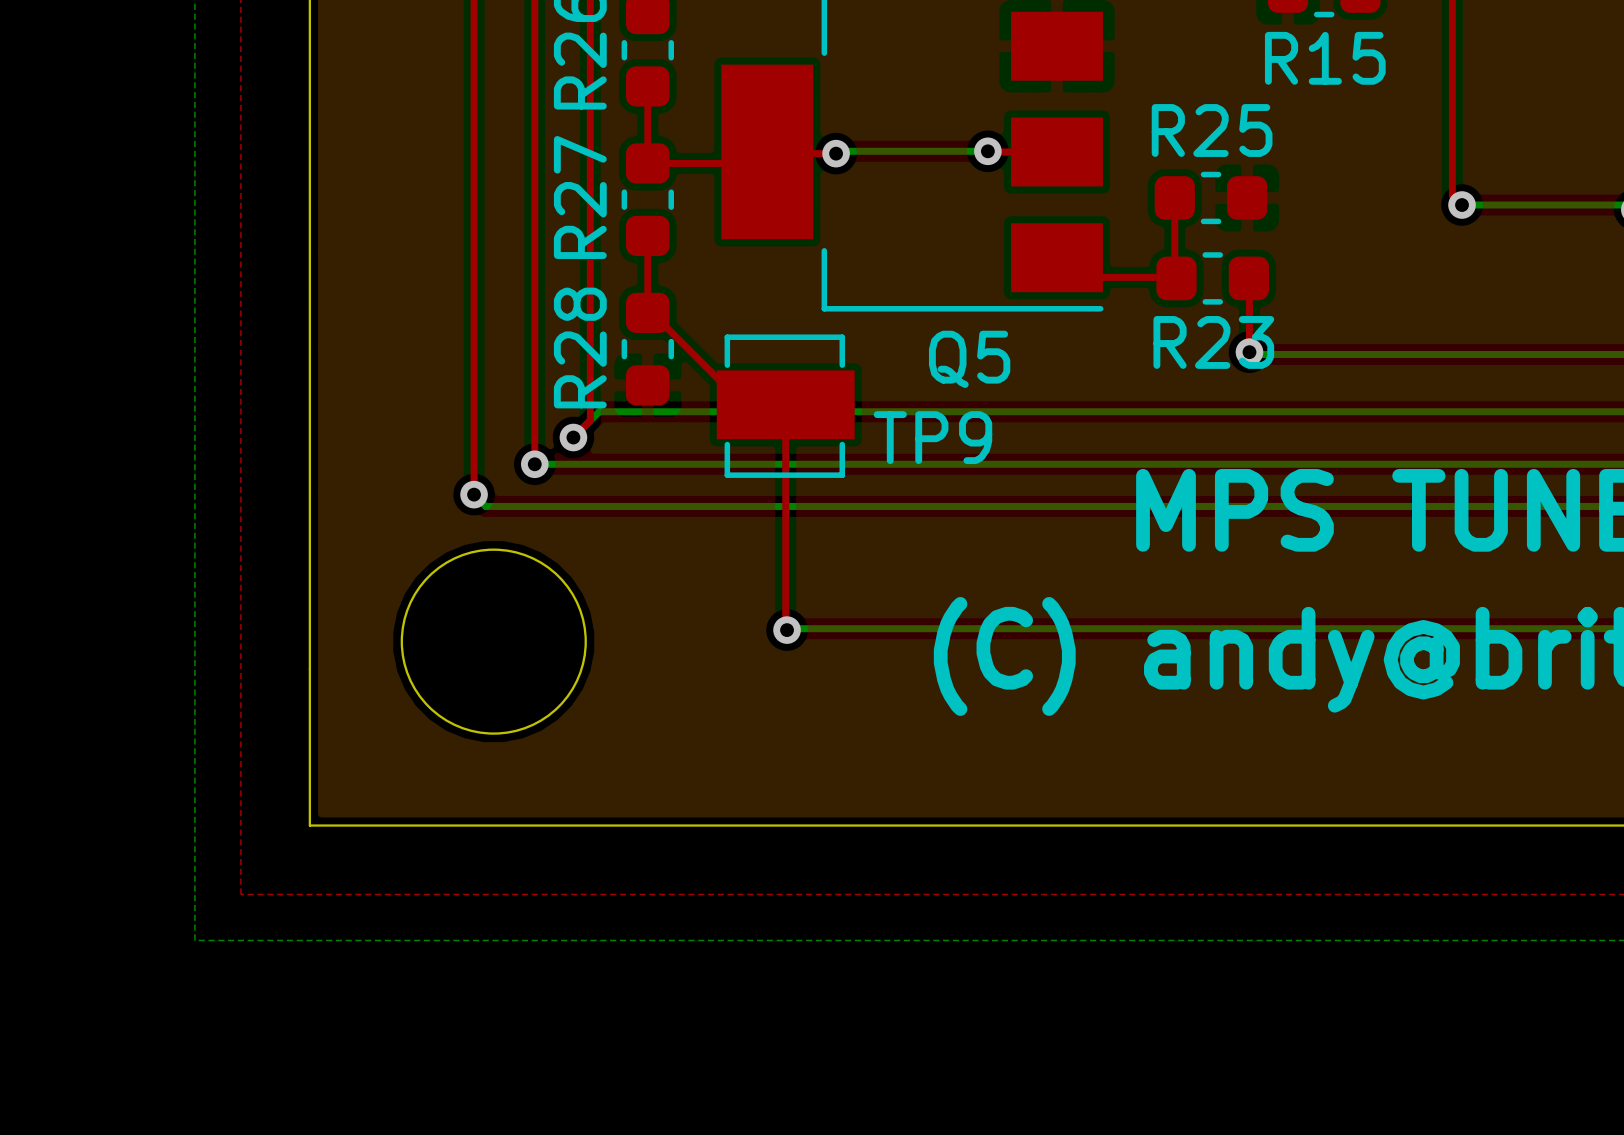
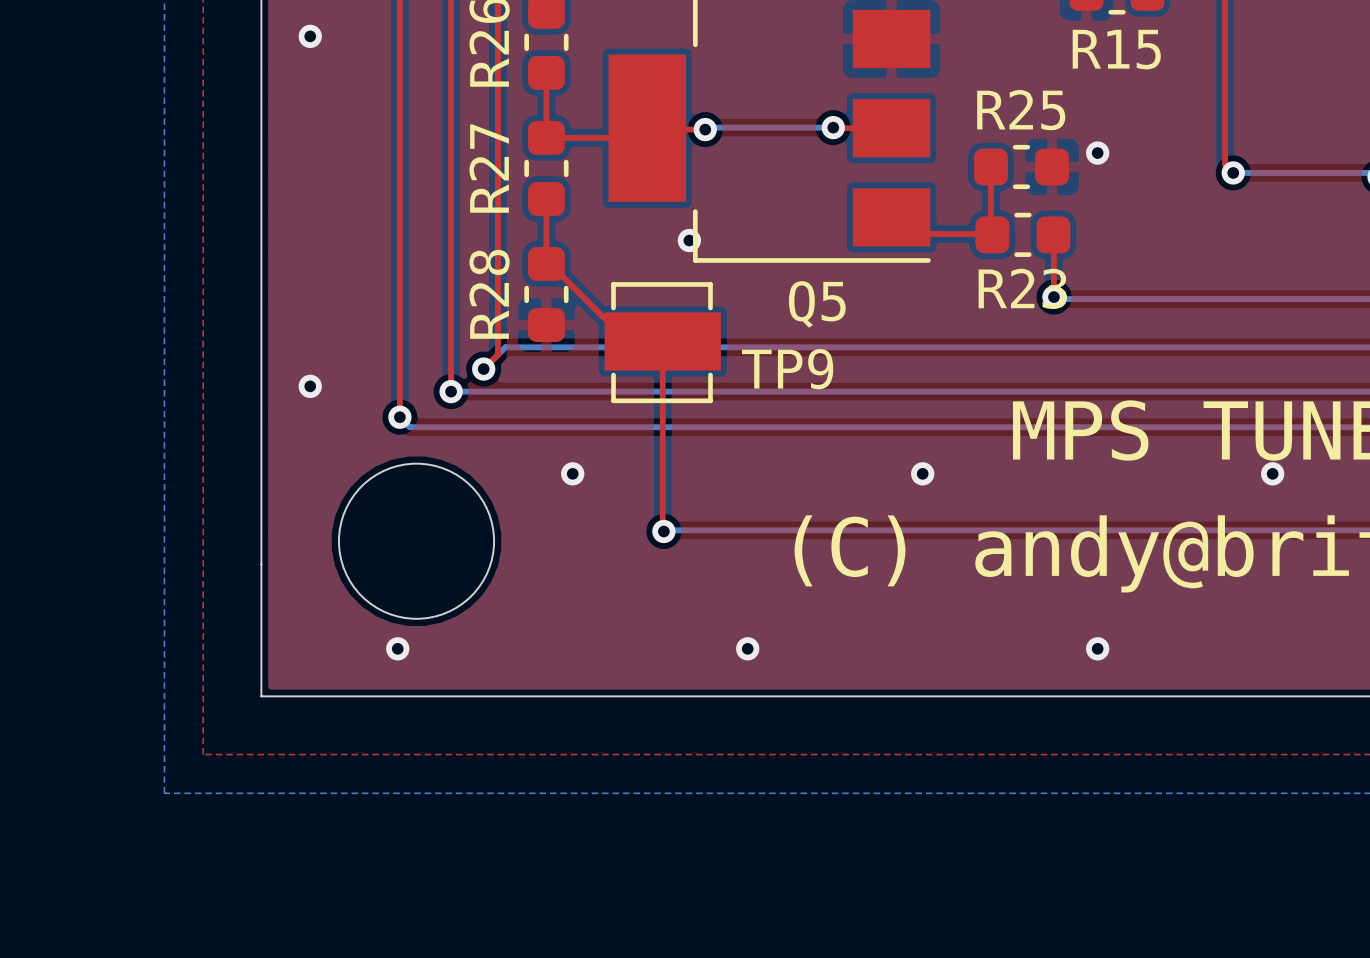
via: none -> (310, 36)
via: none -> (1097, 153)
via: none -> (689, 240)
via: none -> (310, 386)
via: none -> (572, 473)
via: none -> (922, 473)
via: none -> (1272, 473)
via: none -> (397, 648)
via: none -> (747, 648)
via: none -> (1097, 648)

